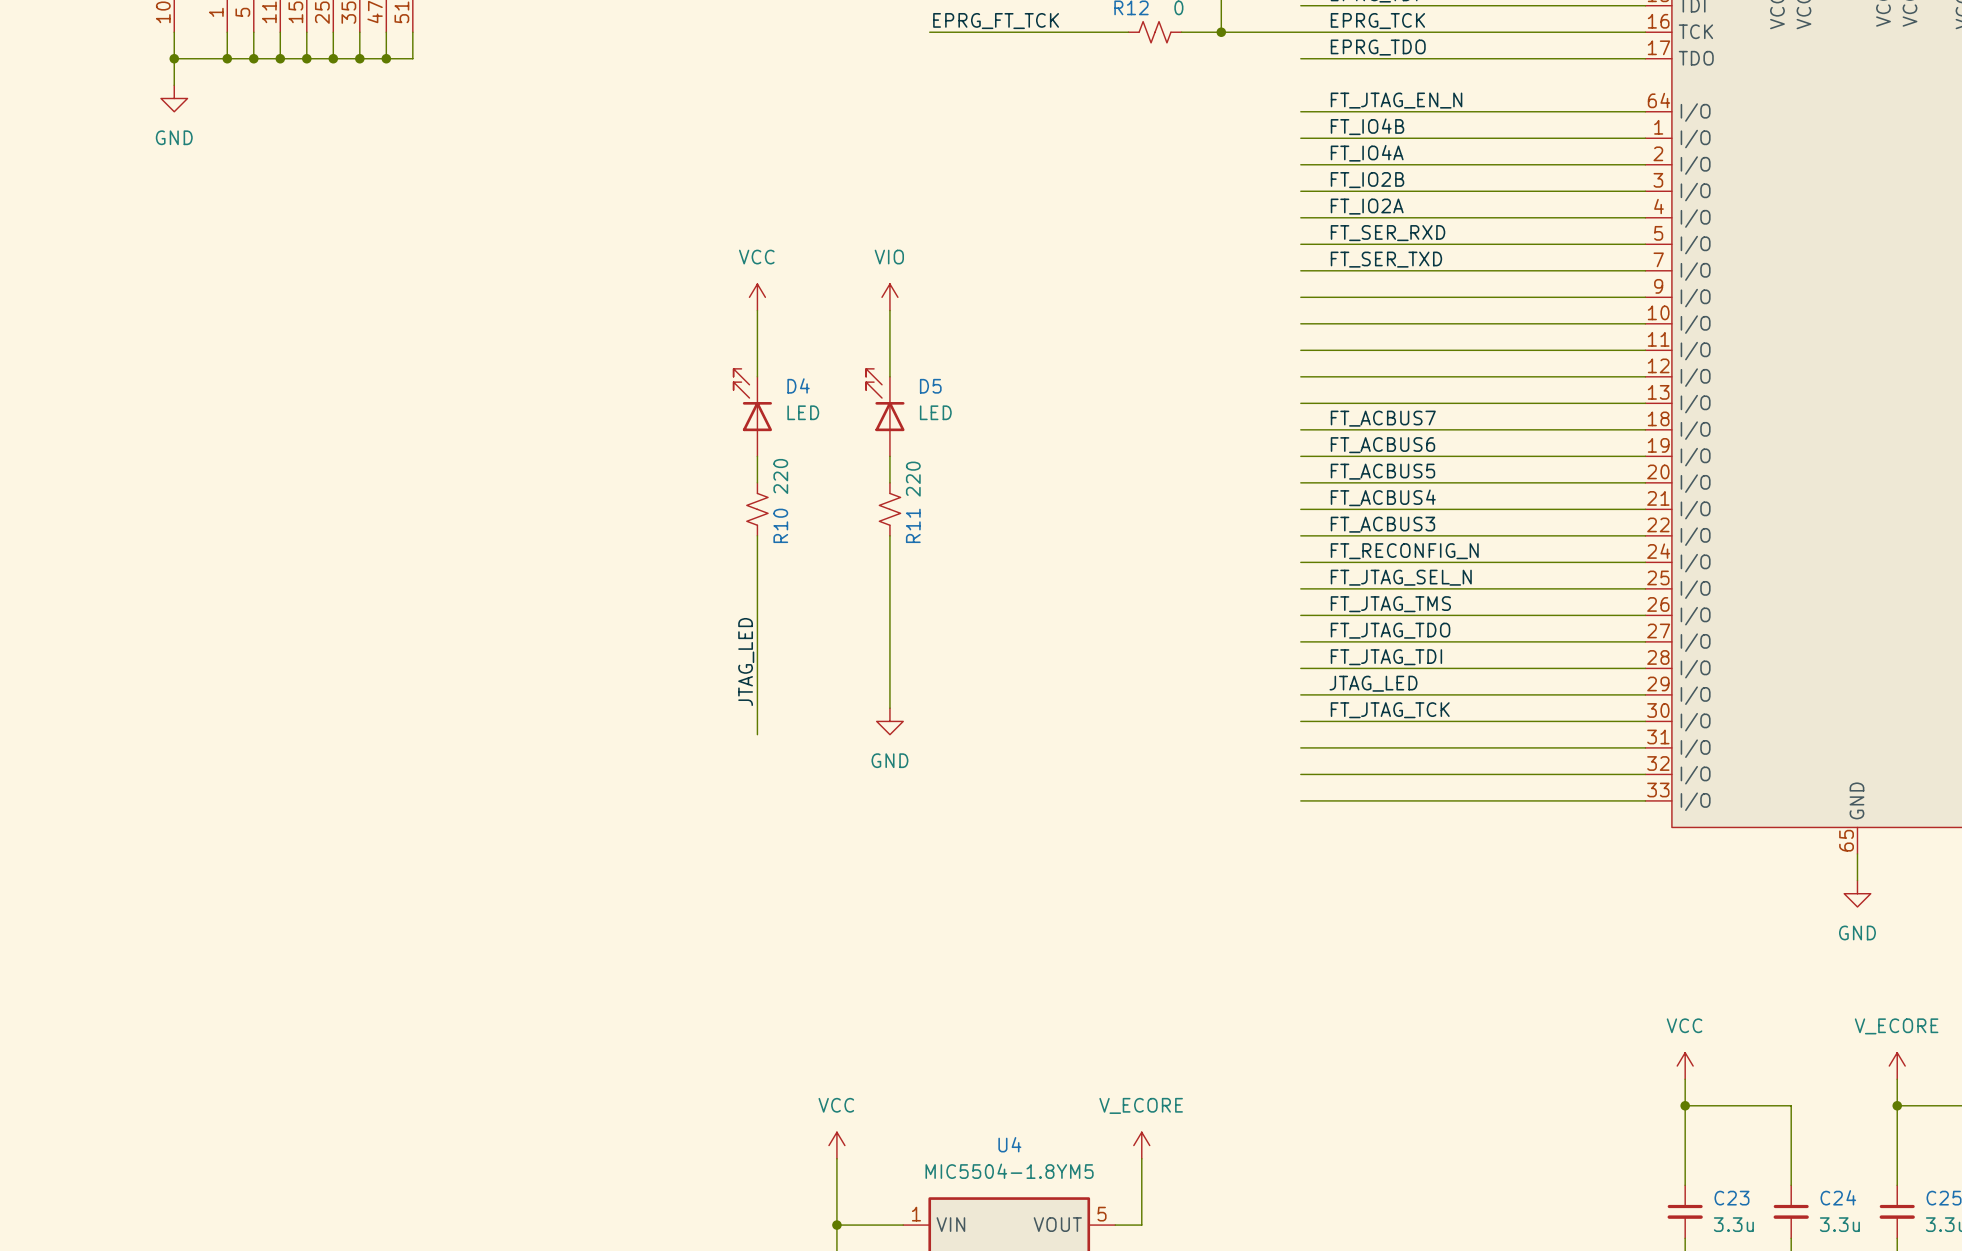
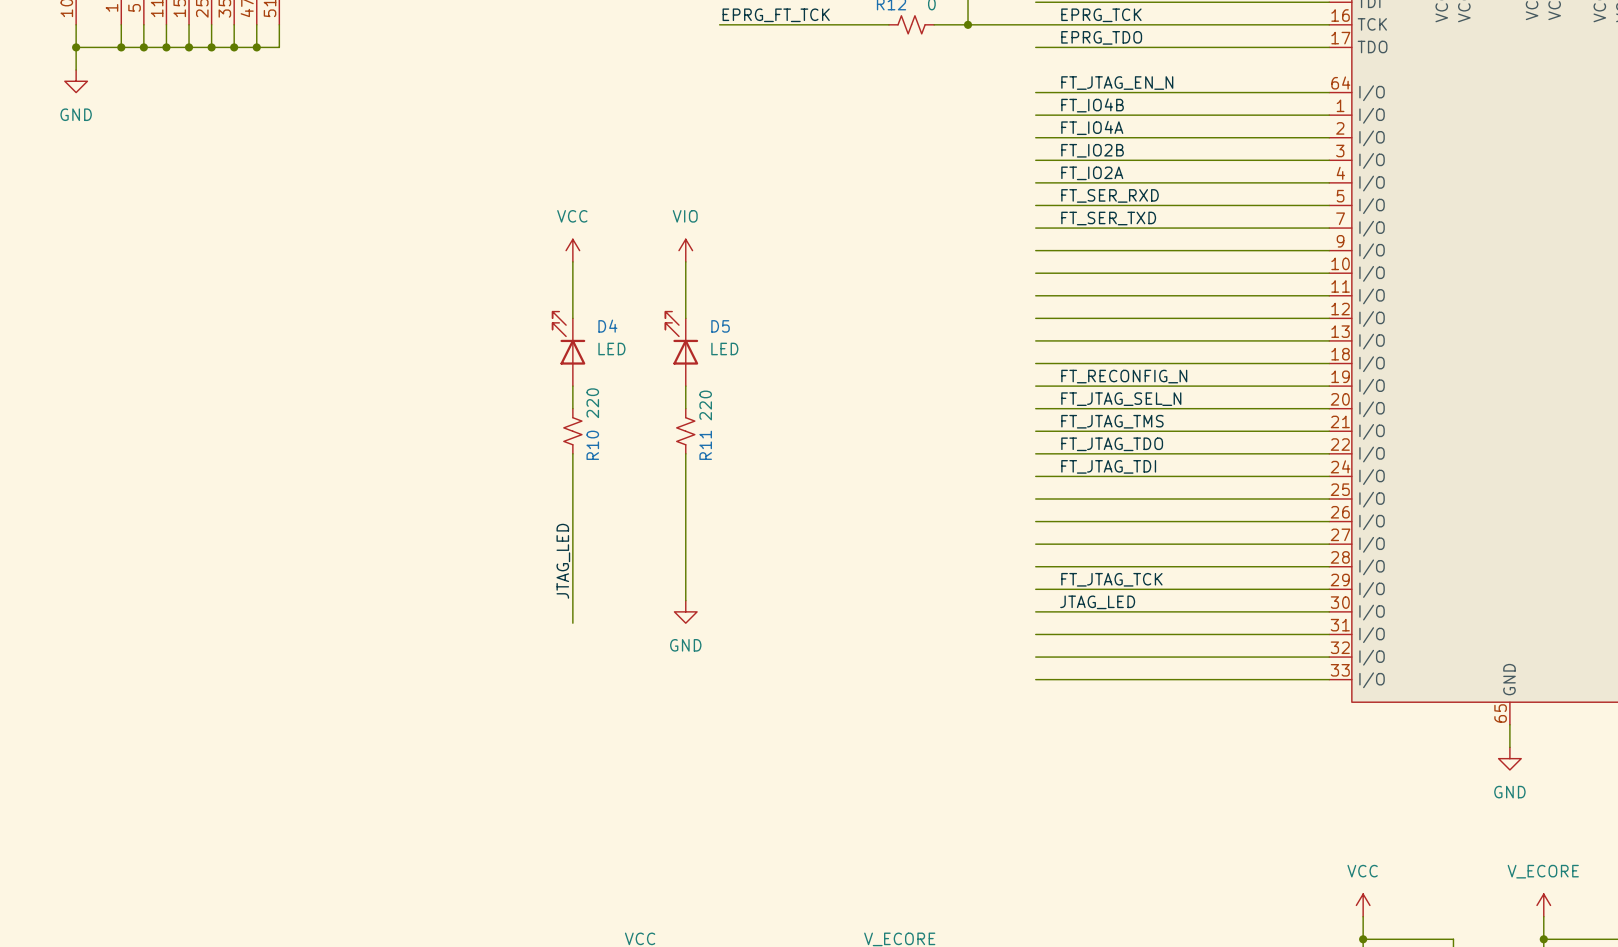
label: FT_ACBUS7 (1383, 418) -> none
label: FT_ACBUS6 (1382, 445) -> FT_RECONFIG_N (1124, 376)
label: FT_ACBUS5 (1382, 471) -> FT_JTAG_SEL_N (1121, 399)
label: FT_ACBUS4 (1383, 497) -> FT_JTAG_TMS (1112, 421)
label: FT_ACBUS3 (1382, 524) -> FT_JTAG_TDO (1112, 444)
label: FT_RECONFIG_N (1404, 551) -> FT_JTAG_TDI (1108, 466)
label: FT_JTAG_SEL_N (1401, 577) -> none
label: FT_JTAG_TMS (1390, 604) -> none
label: FT_JTAG_TDO (1390, 630) -> none
label: FT_JTAG_TDI (1386, 657) -> none
label: JTAG_LED (1373, 683) -> FT_JTAG_TCK (1111, 579)
label: FT_JTAG_TCK (1390, 710) -> JTAG_LED (1097, 602)

